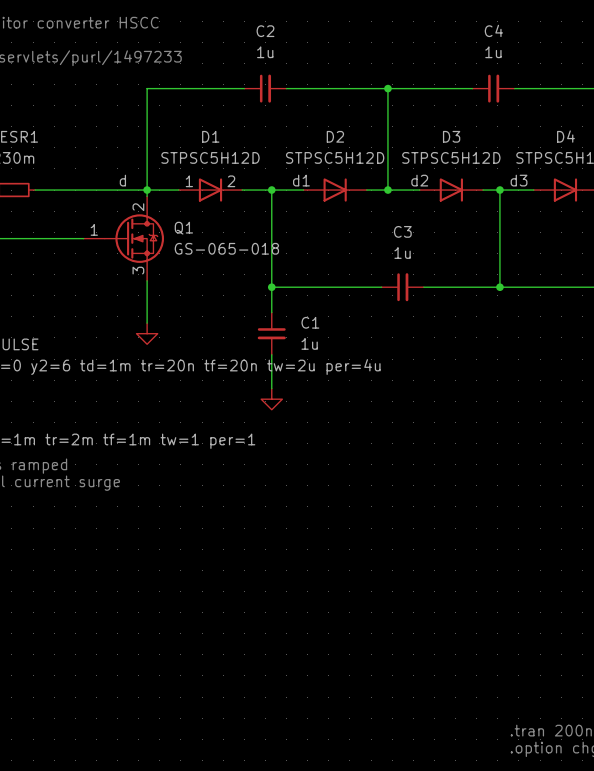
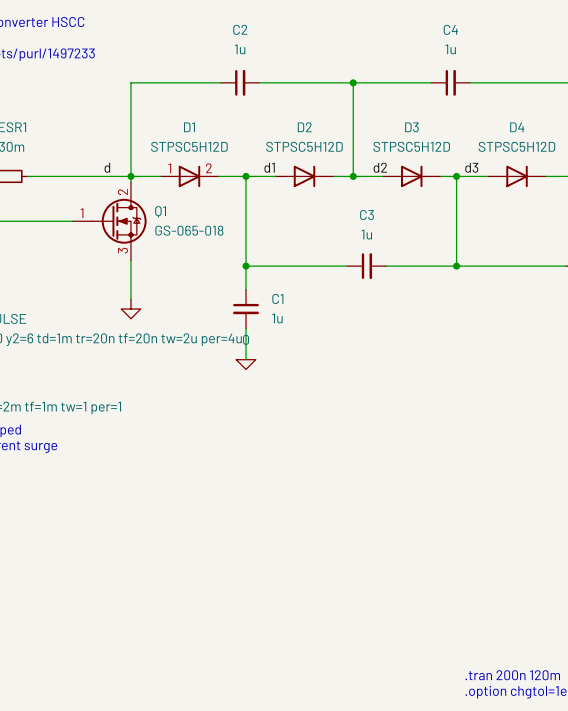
power symbol text: none -> 0 (246, 339)
power symbol shape: [261, 388, 283, 410] -> [236, 359, 256, 370]

